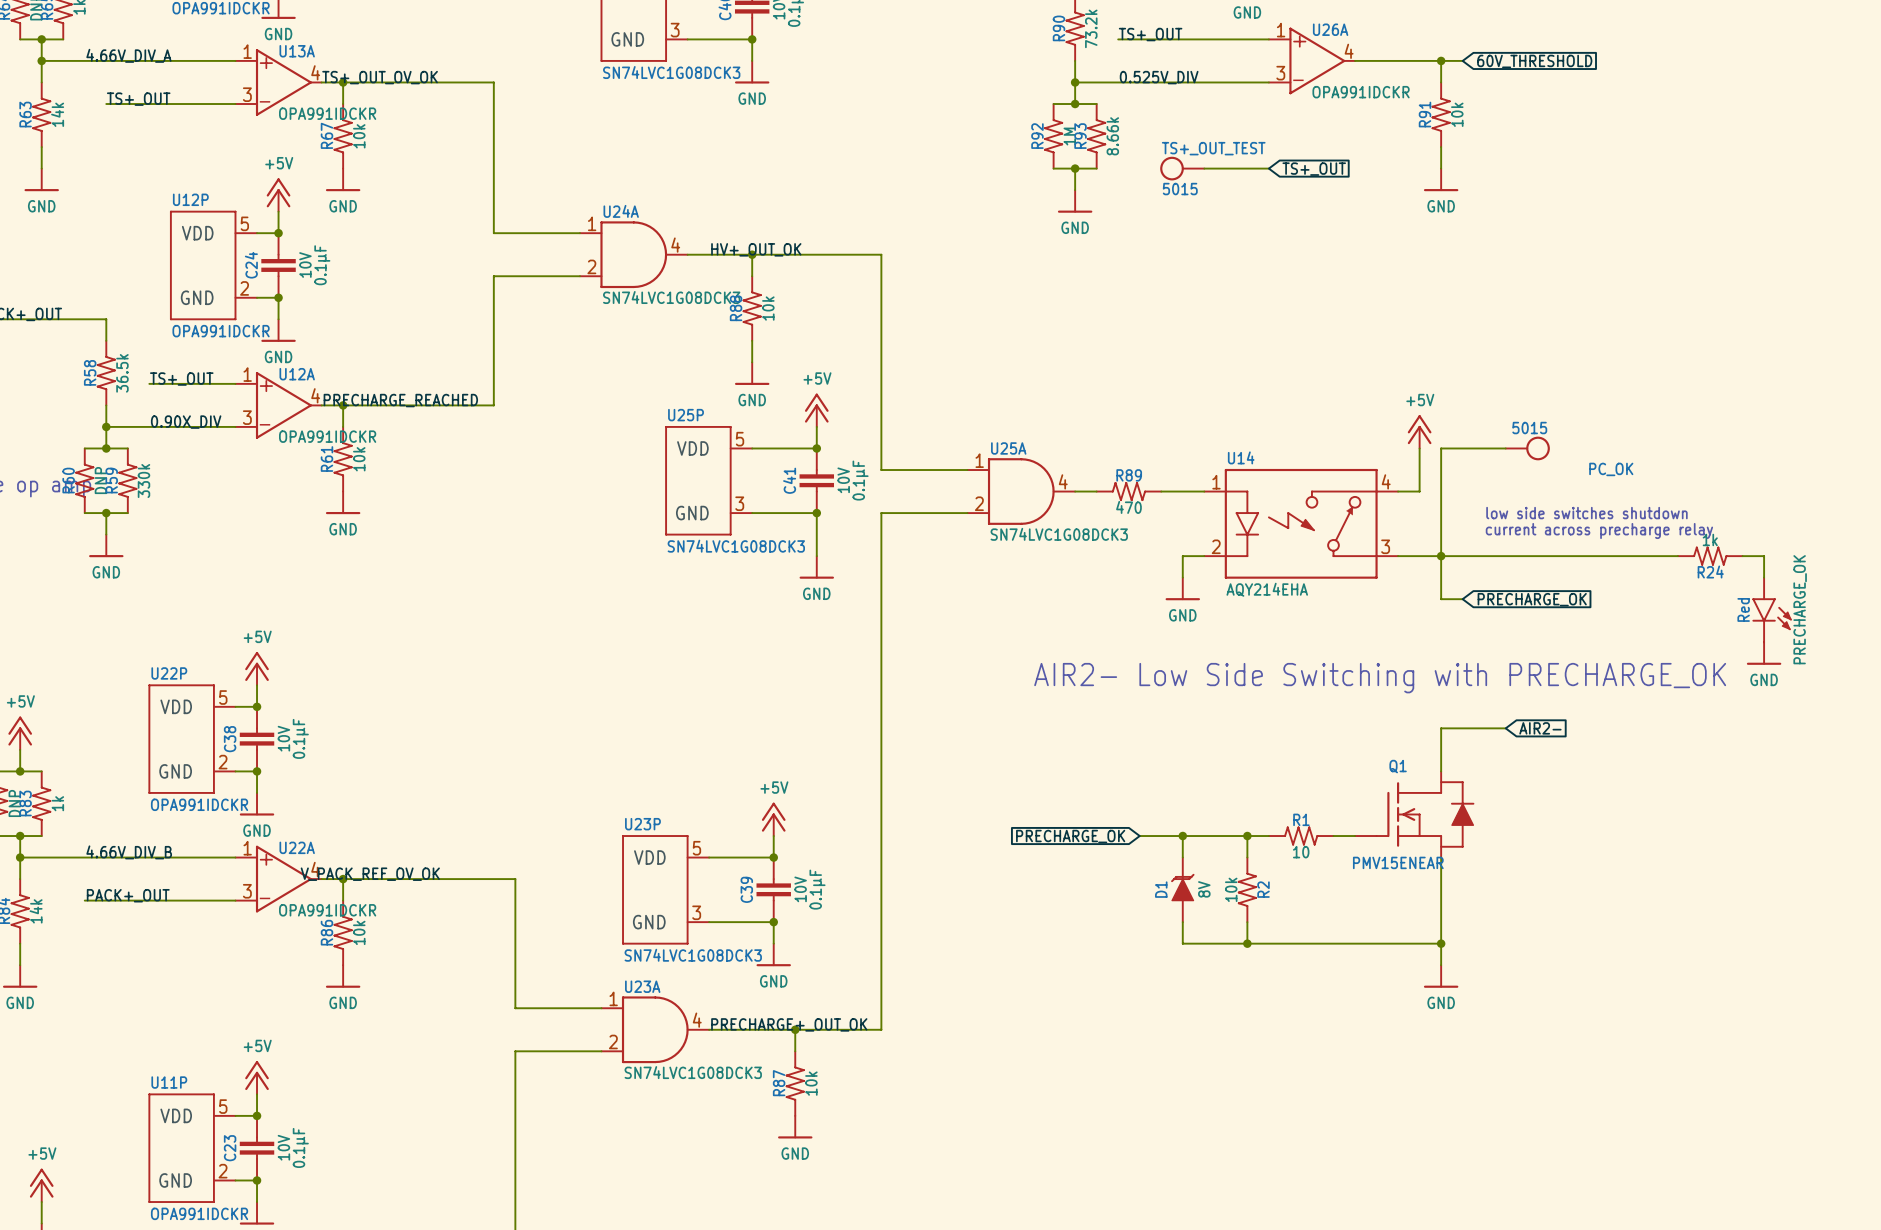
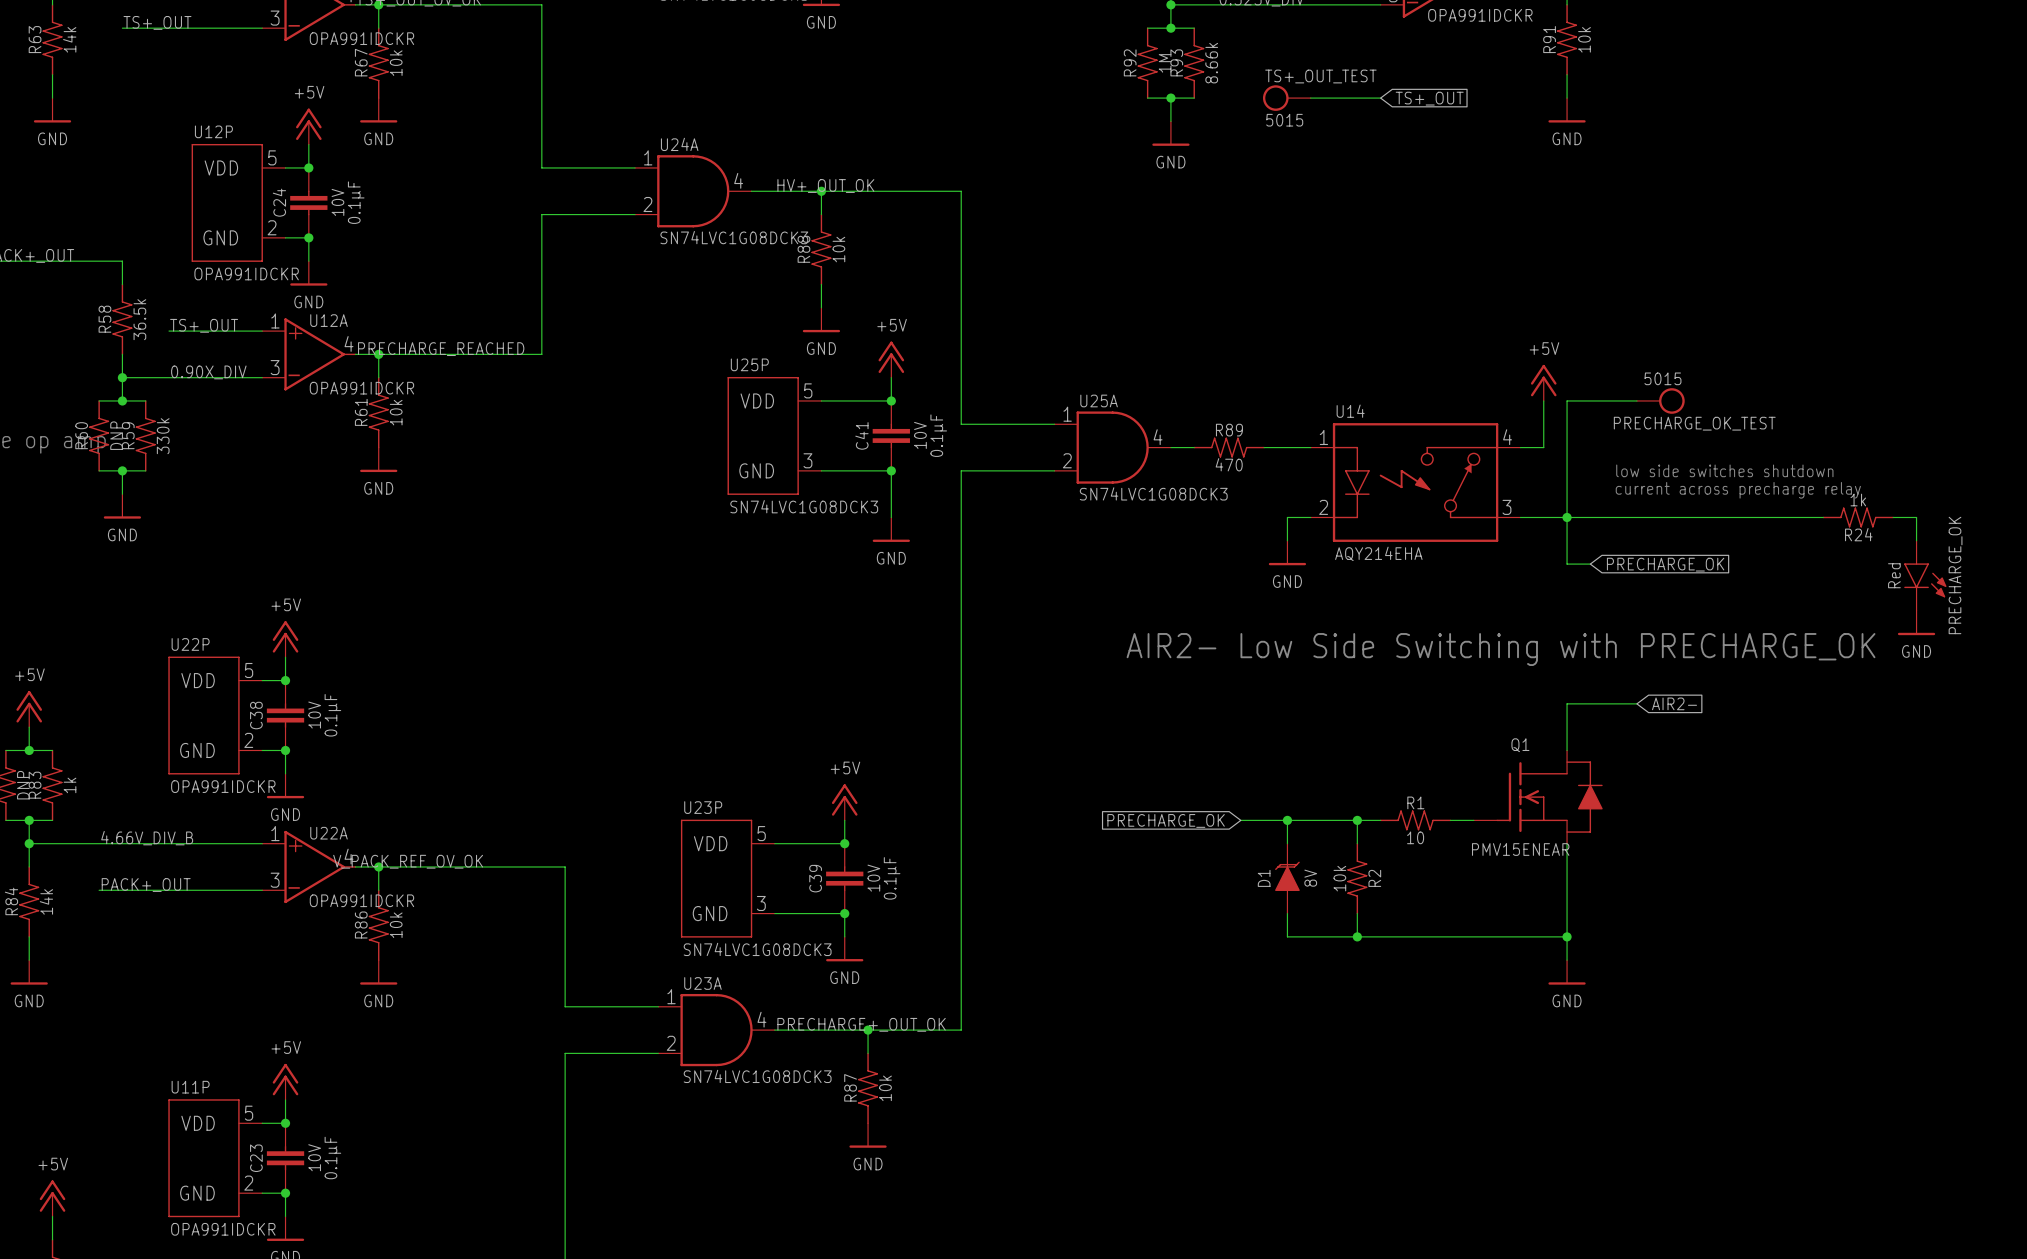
PC_OK name: PC_OK (1611, 469) -> PRECHARGE_OK_TEST (1694, 423)

